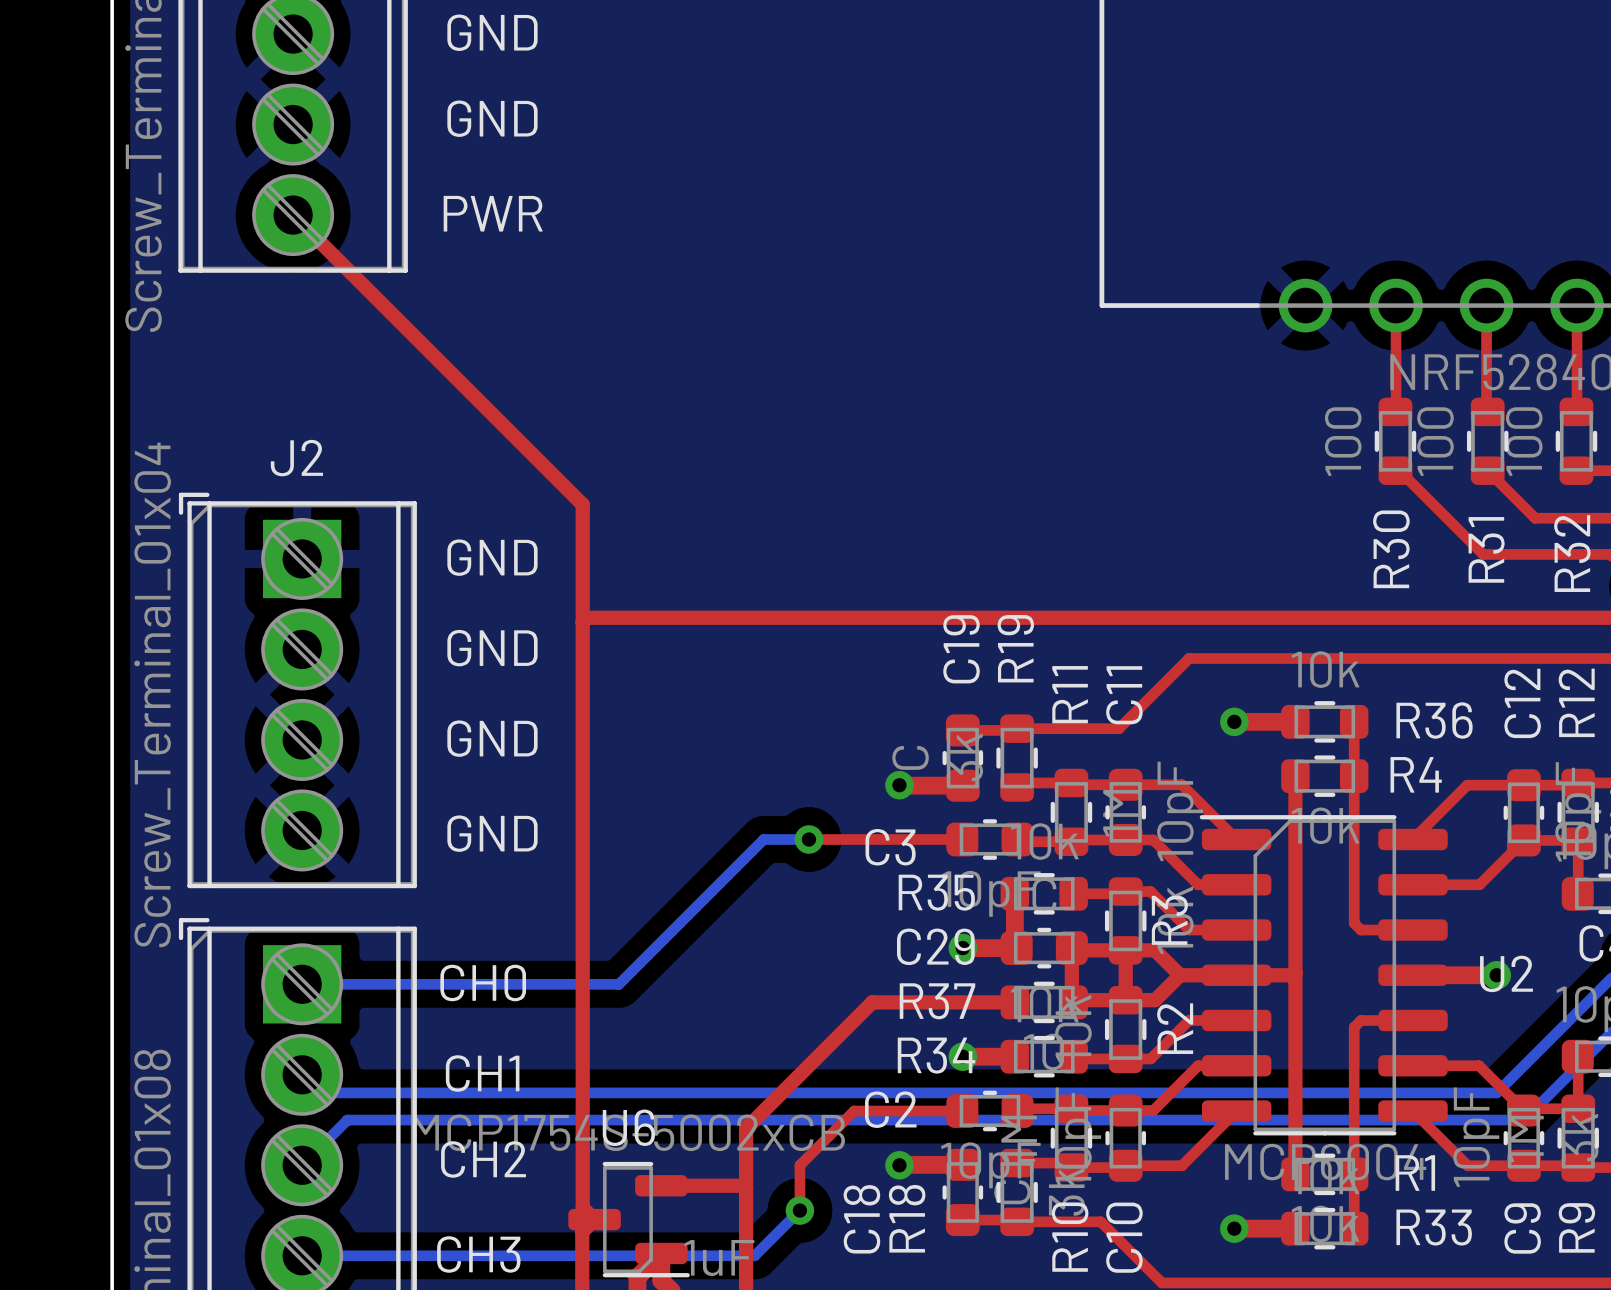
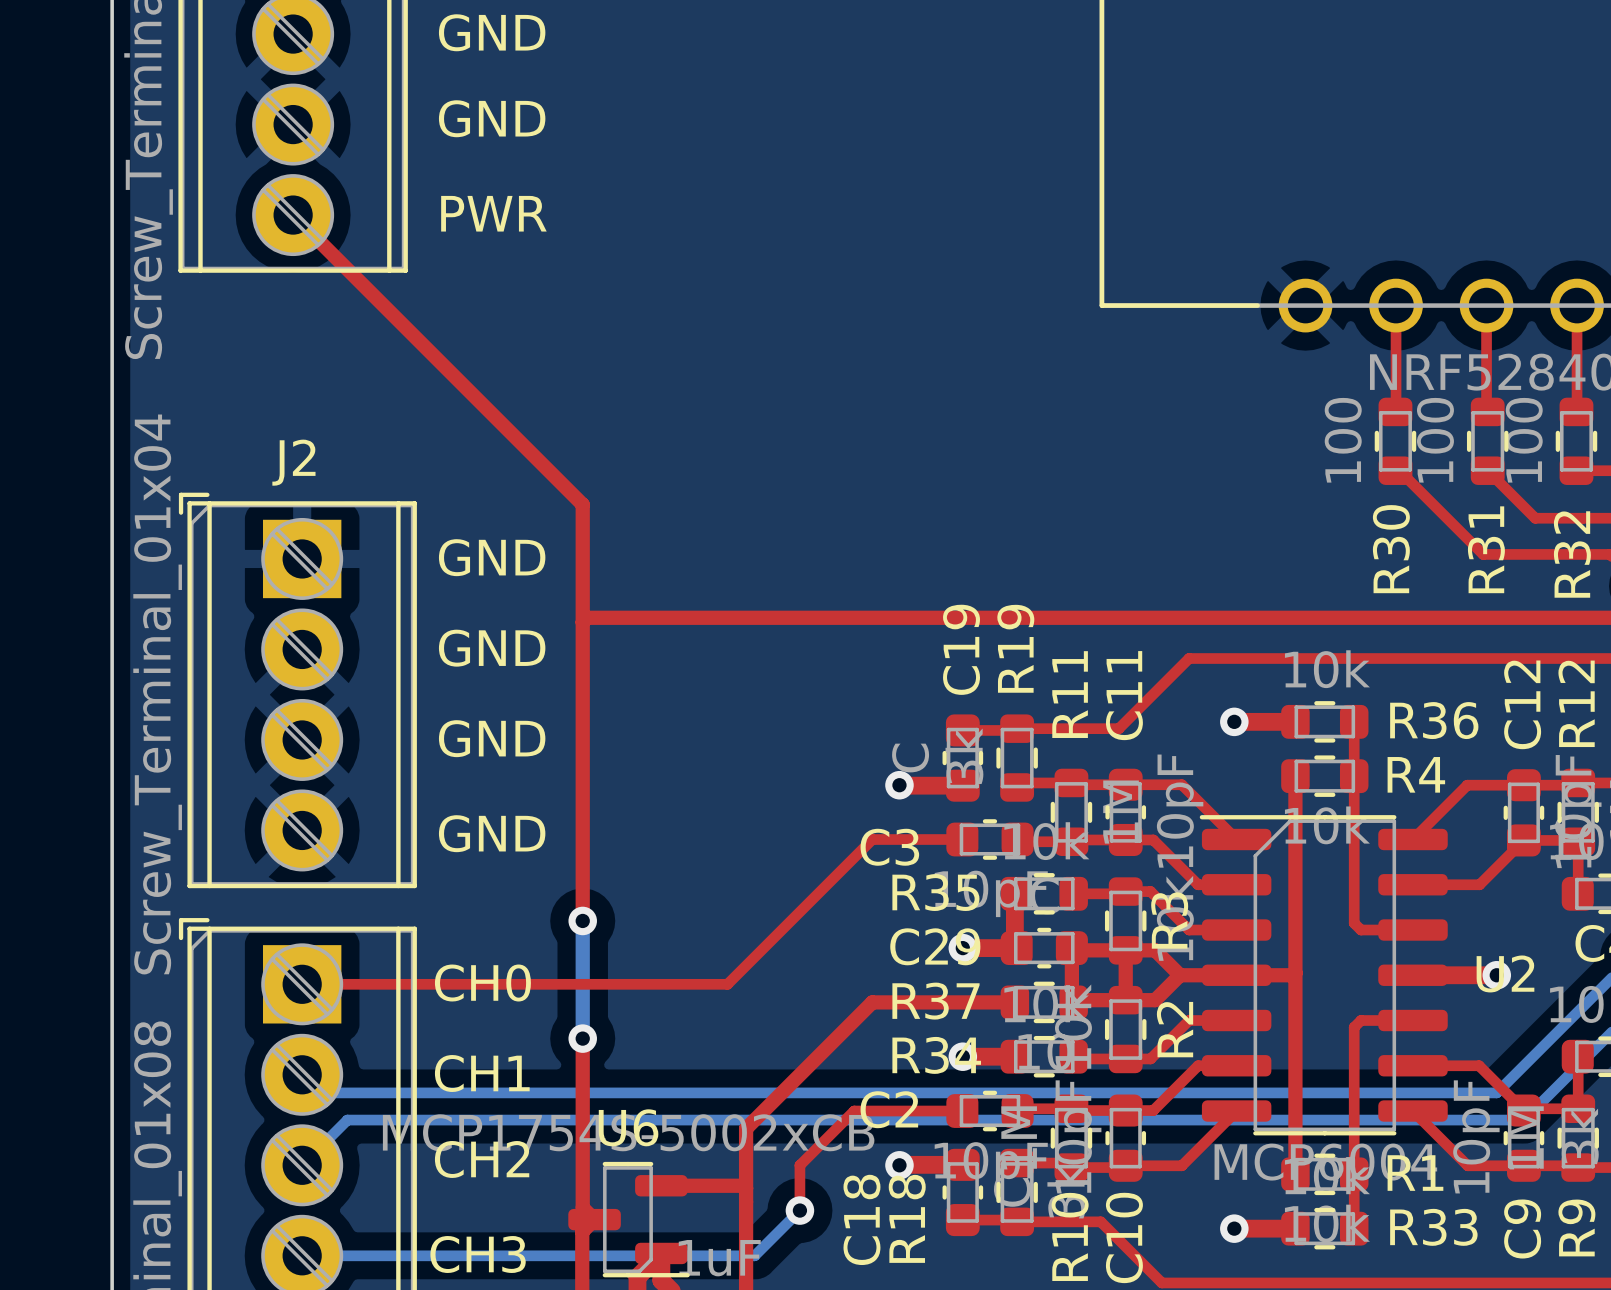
top track: (808, 839) (872, 839) -> (302, 984) (727, 984) (872, 839)
bottom track: (808, 839) (763, 839) (618, 984) (302, 984) -> none
via: (808, 839) -> none
top track: (582, 920) (582, 1038) -> none
bottom track: none -> (582, 920) (582, 1038)
via: none -> (582, 920)
via: none -> (582, 1038)

